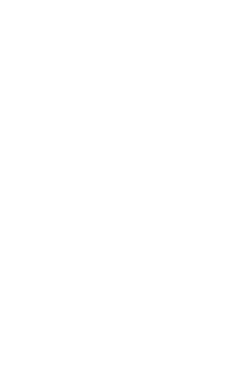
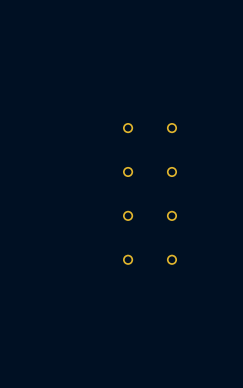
part: none -> (150, 193)

